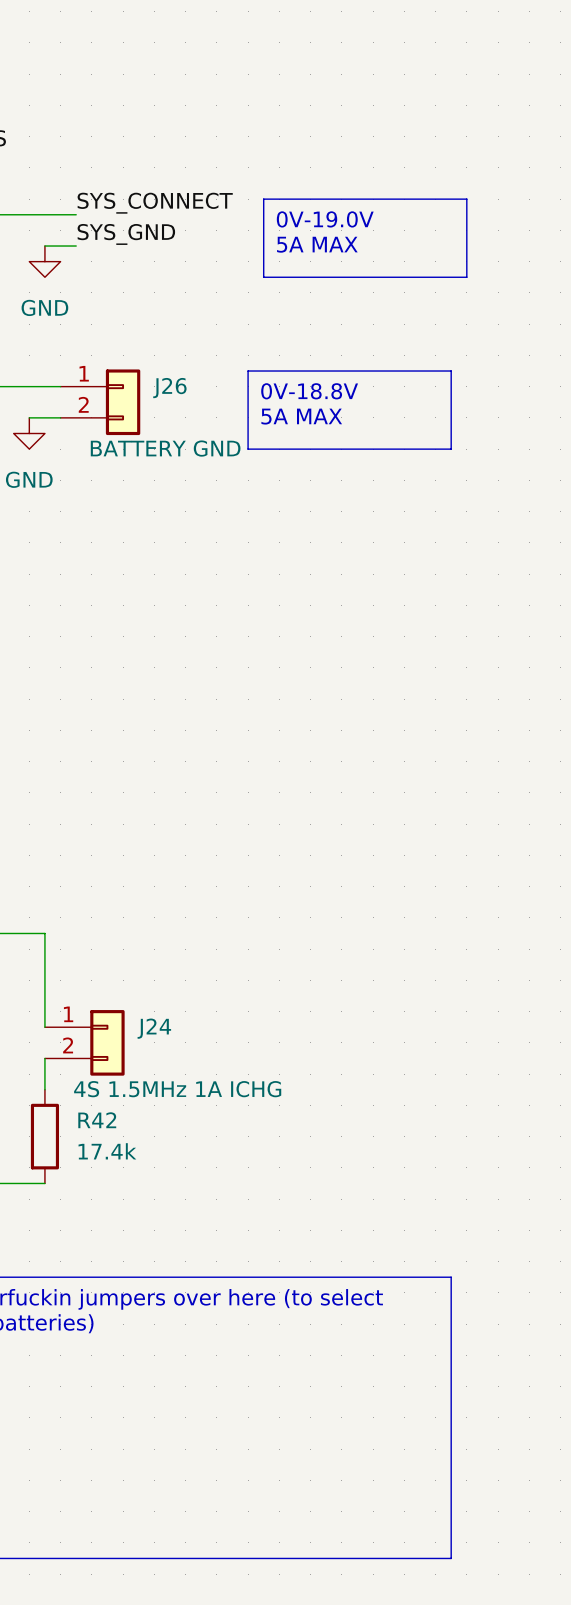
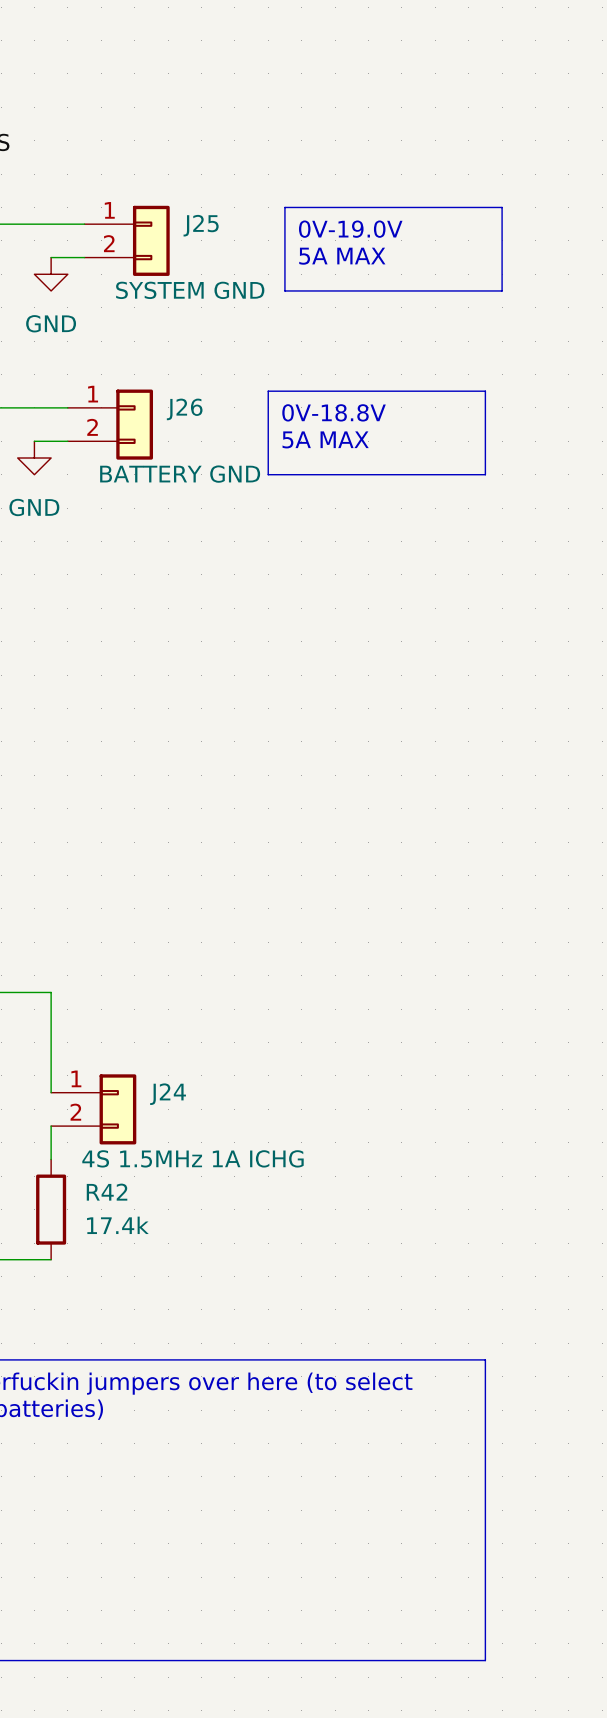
label: SYS_CONNECT (155, 203) -> none
J25: none -> SYSTEM GND (127, 240)
label: SYS_GND (126, 234) -> none

